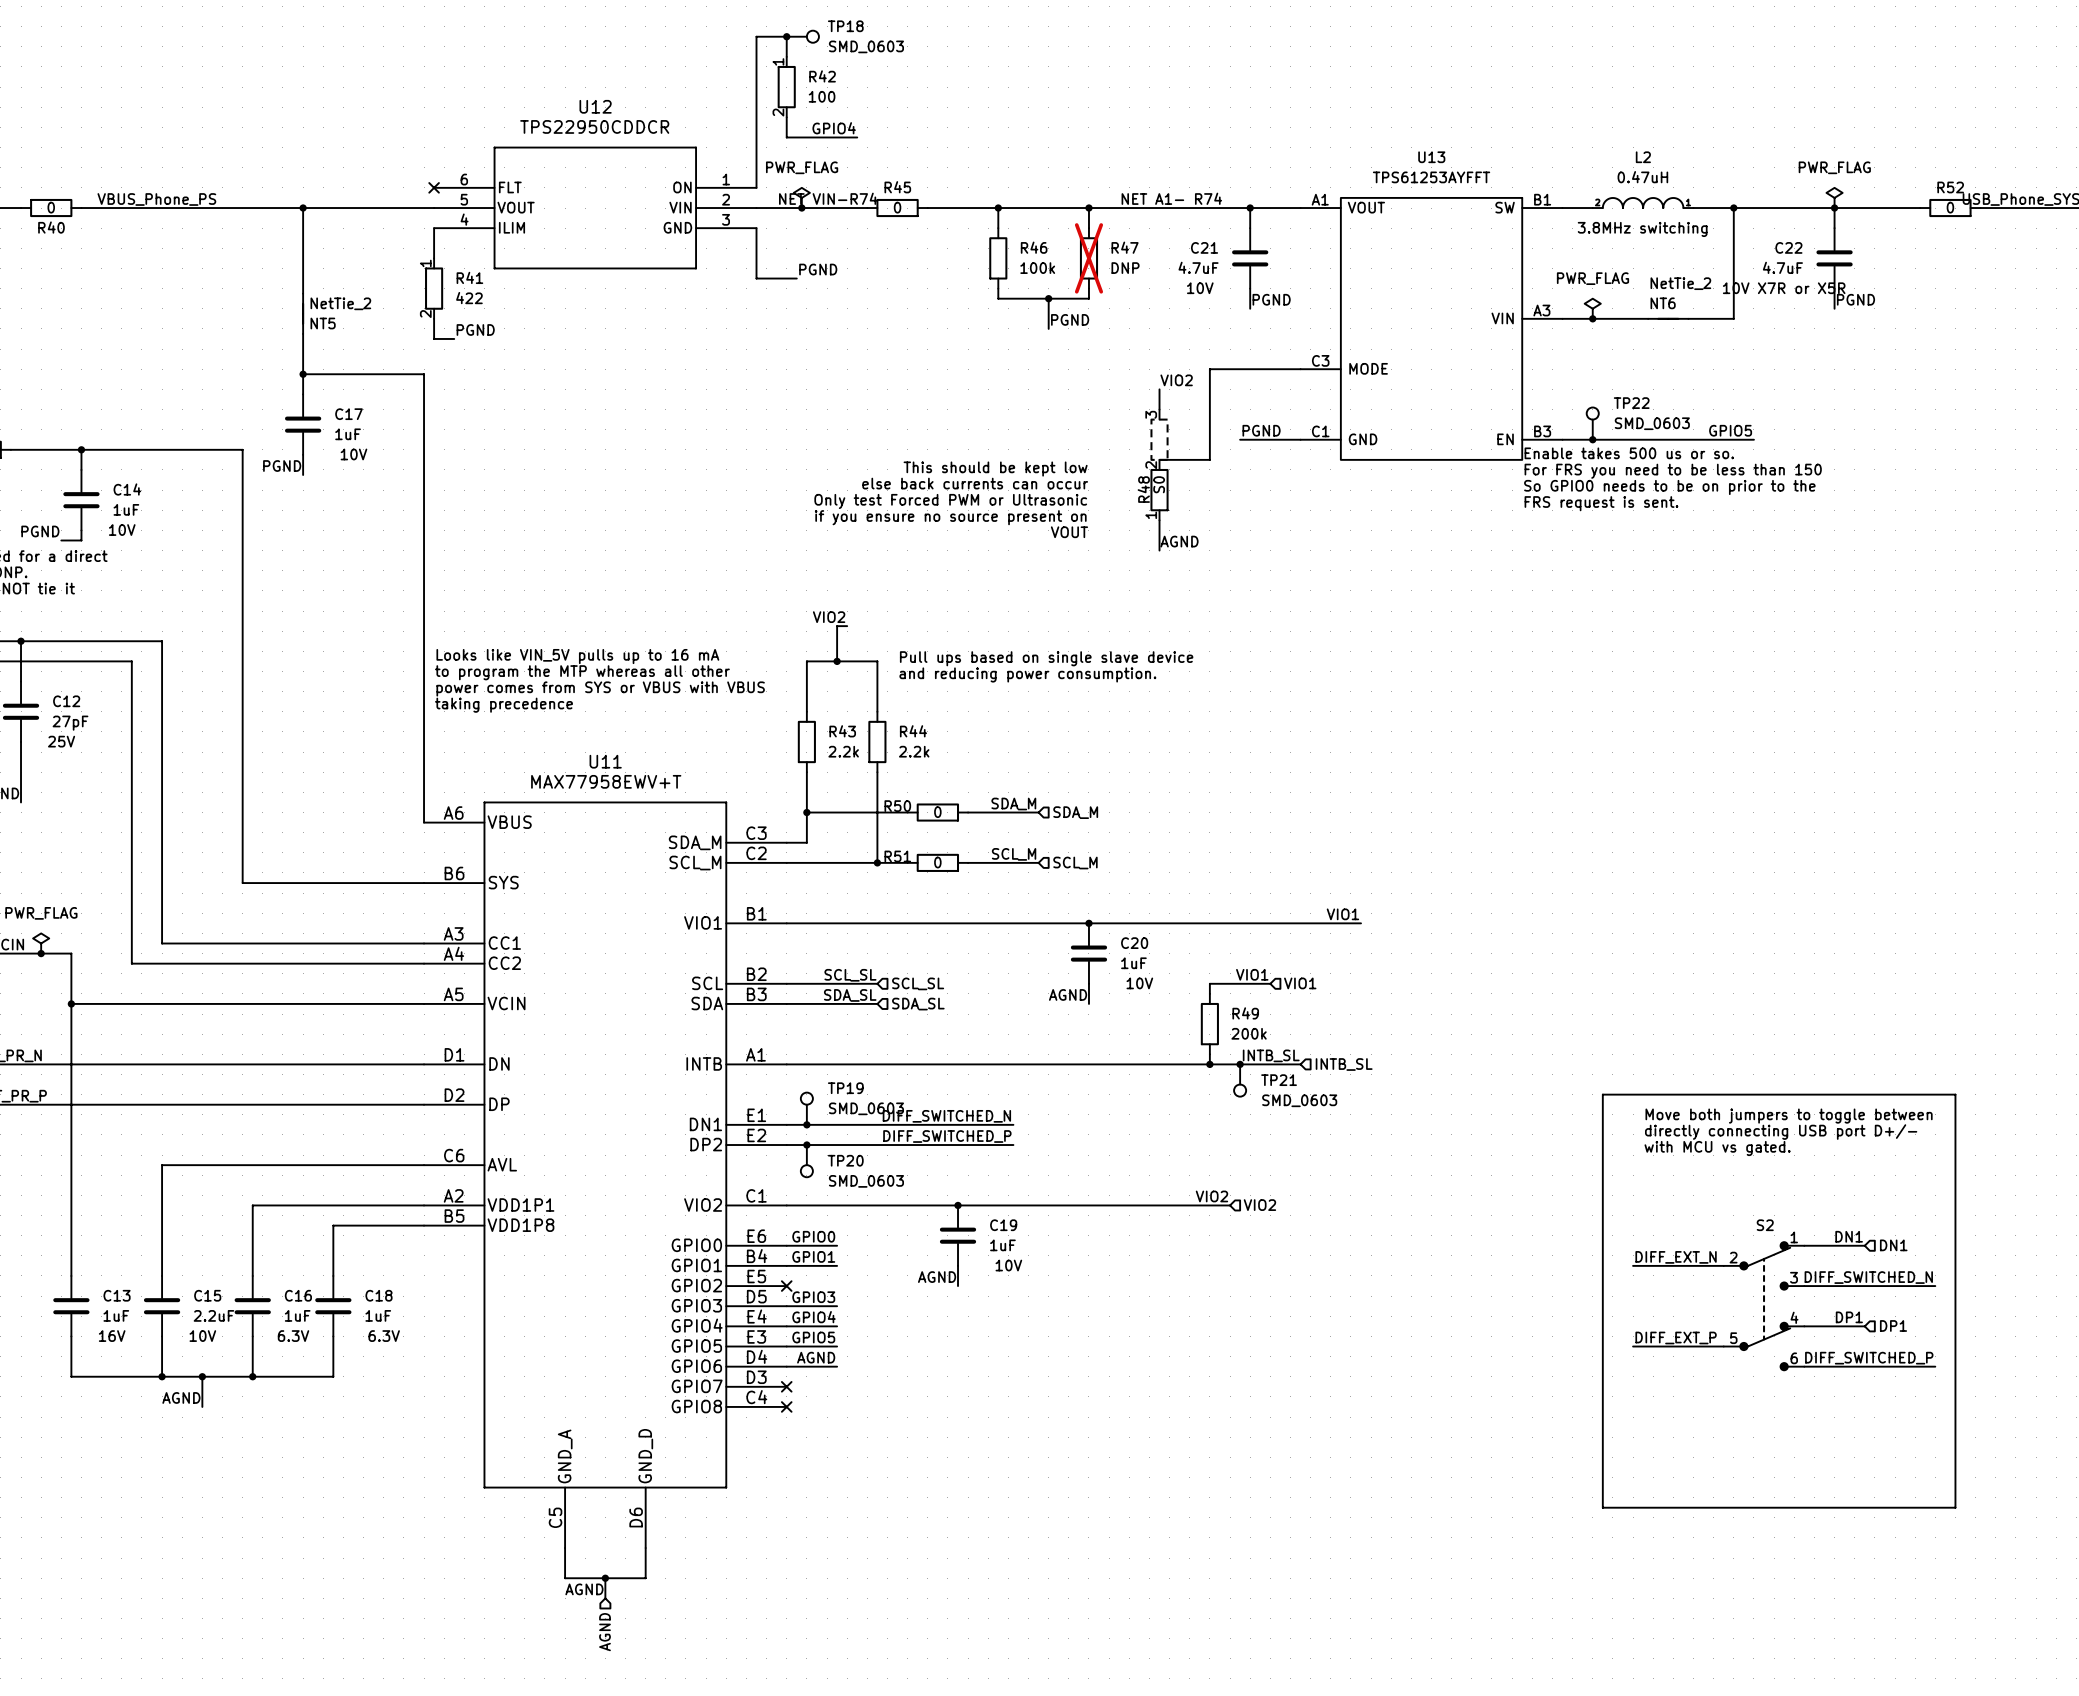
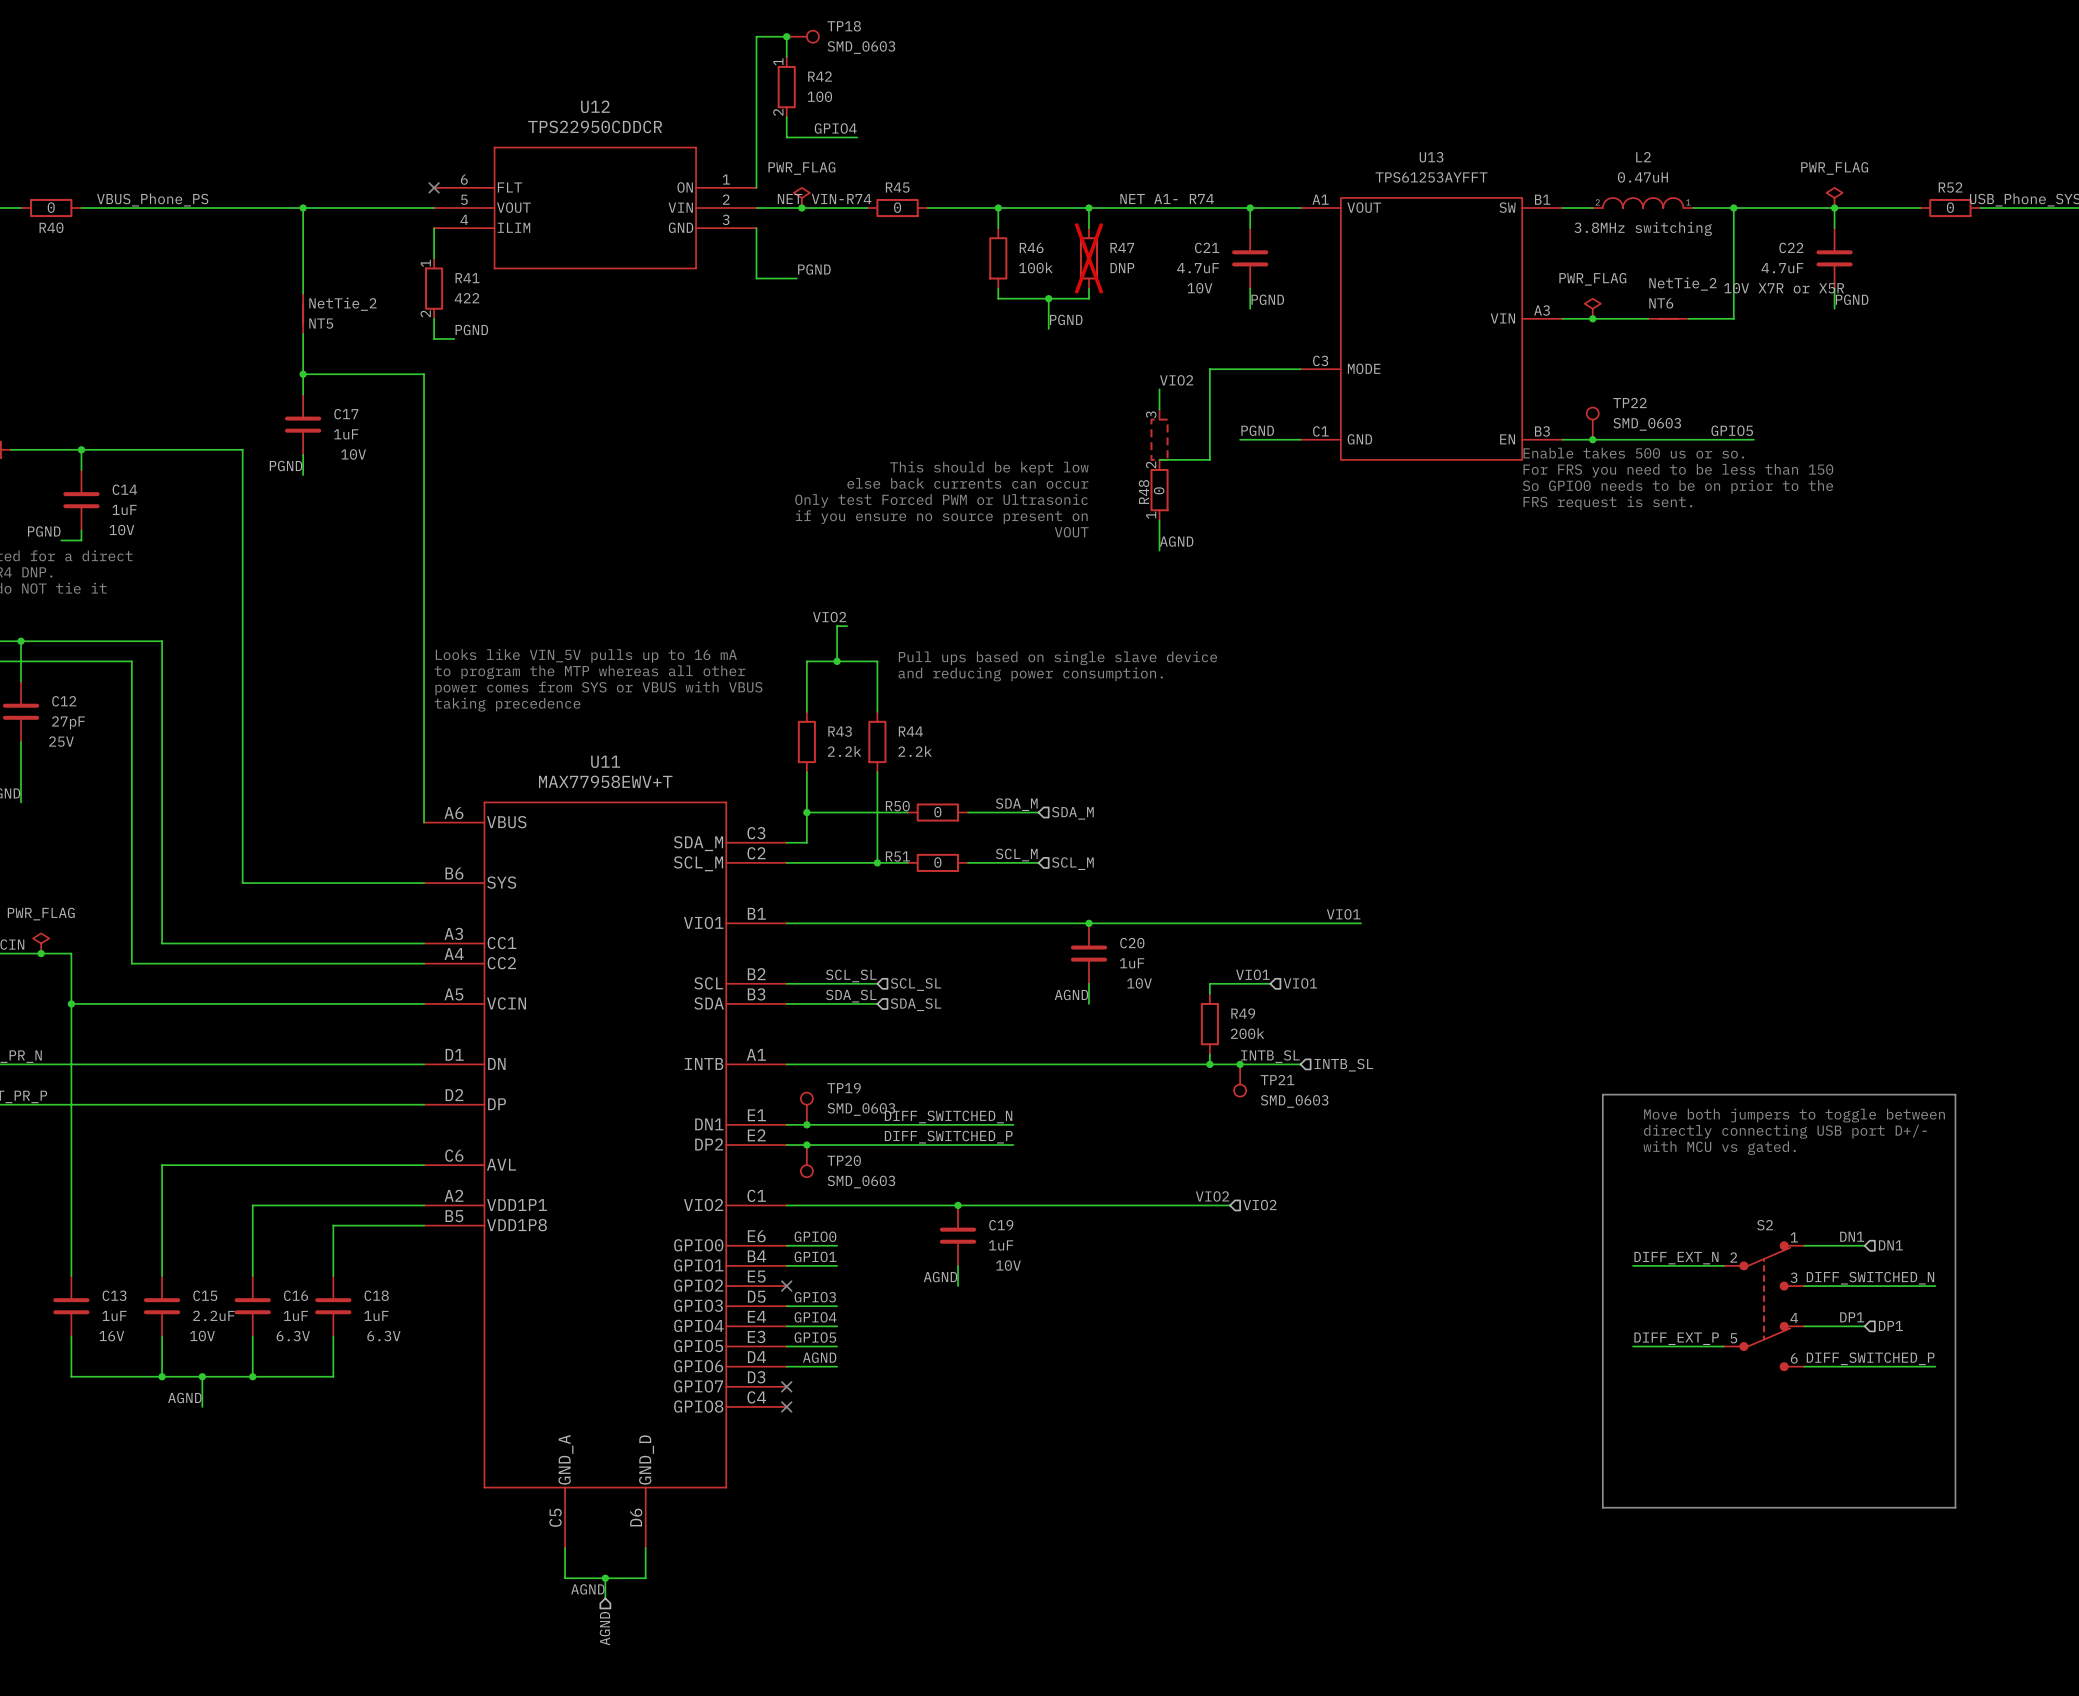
R48 value: S0 (1159, 484) -> 0 (1159, 490)

